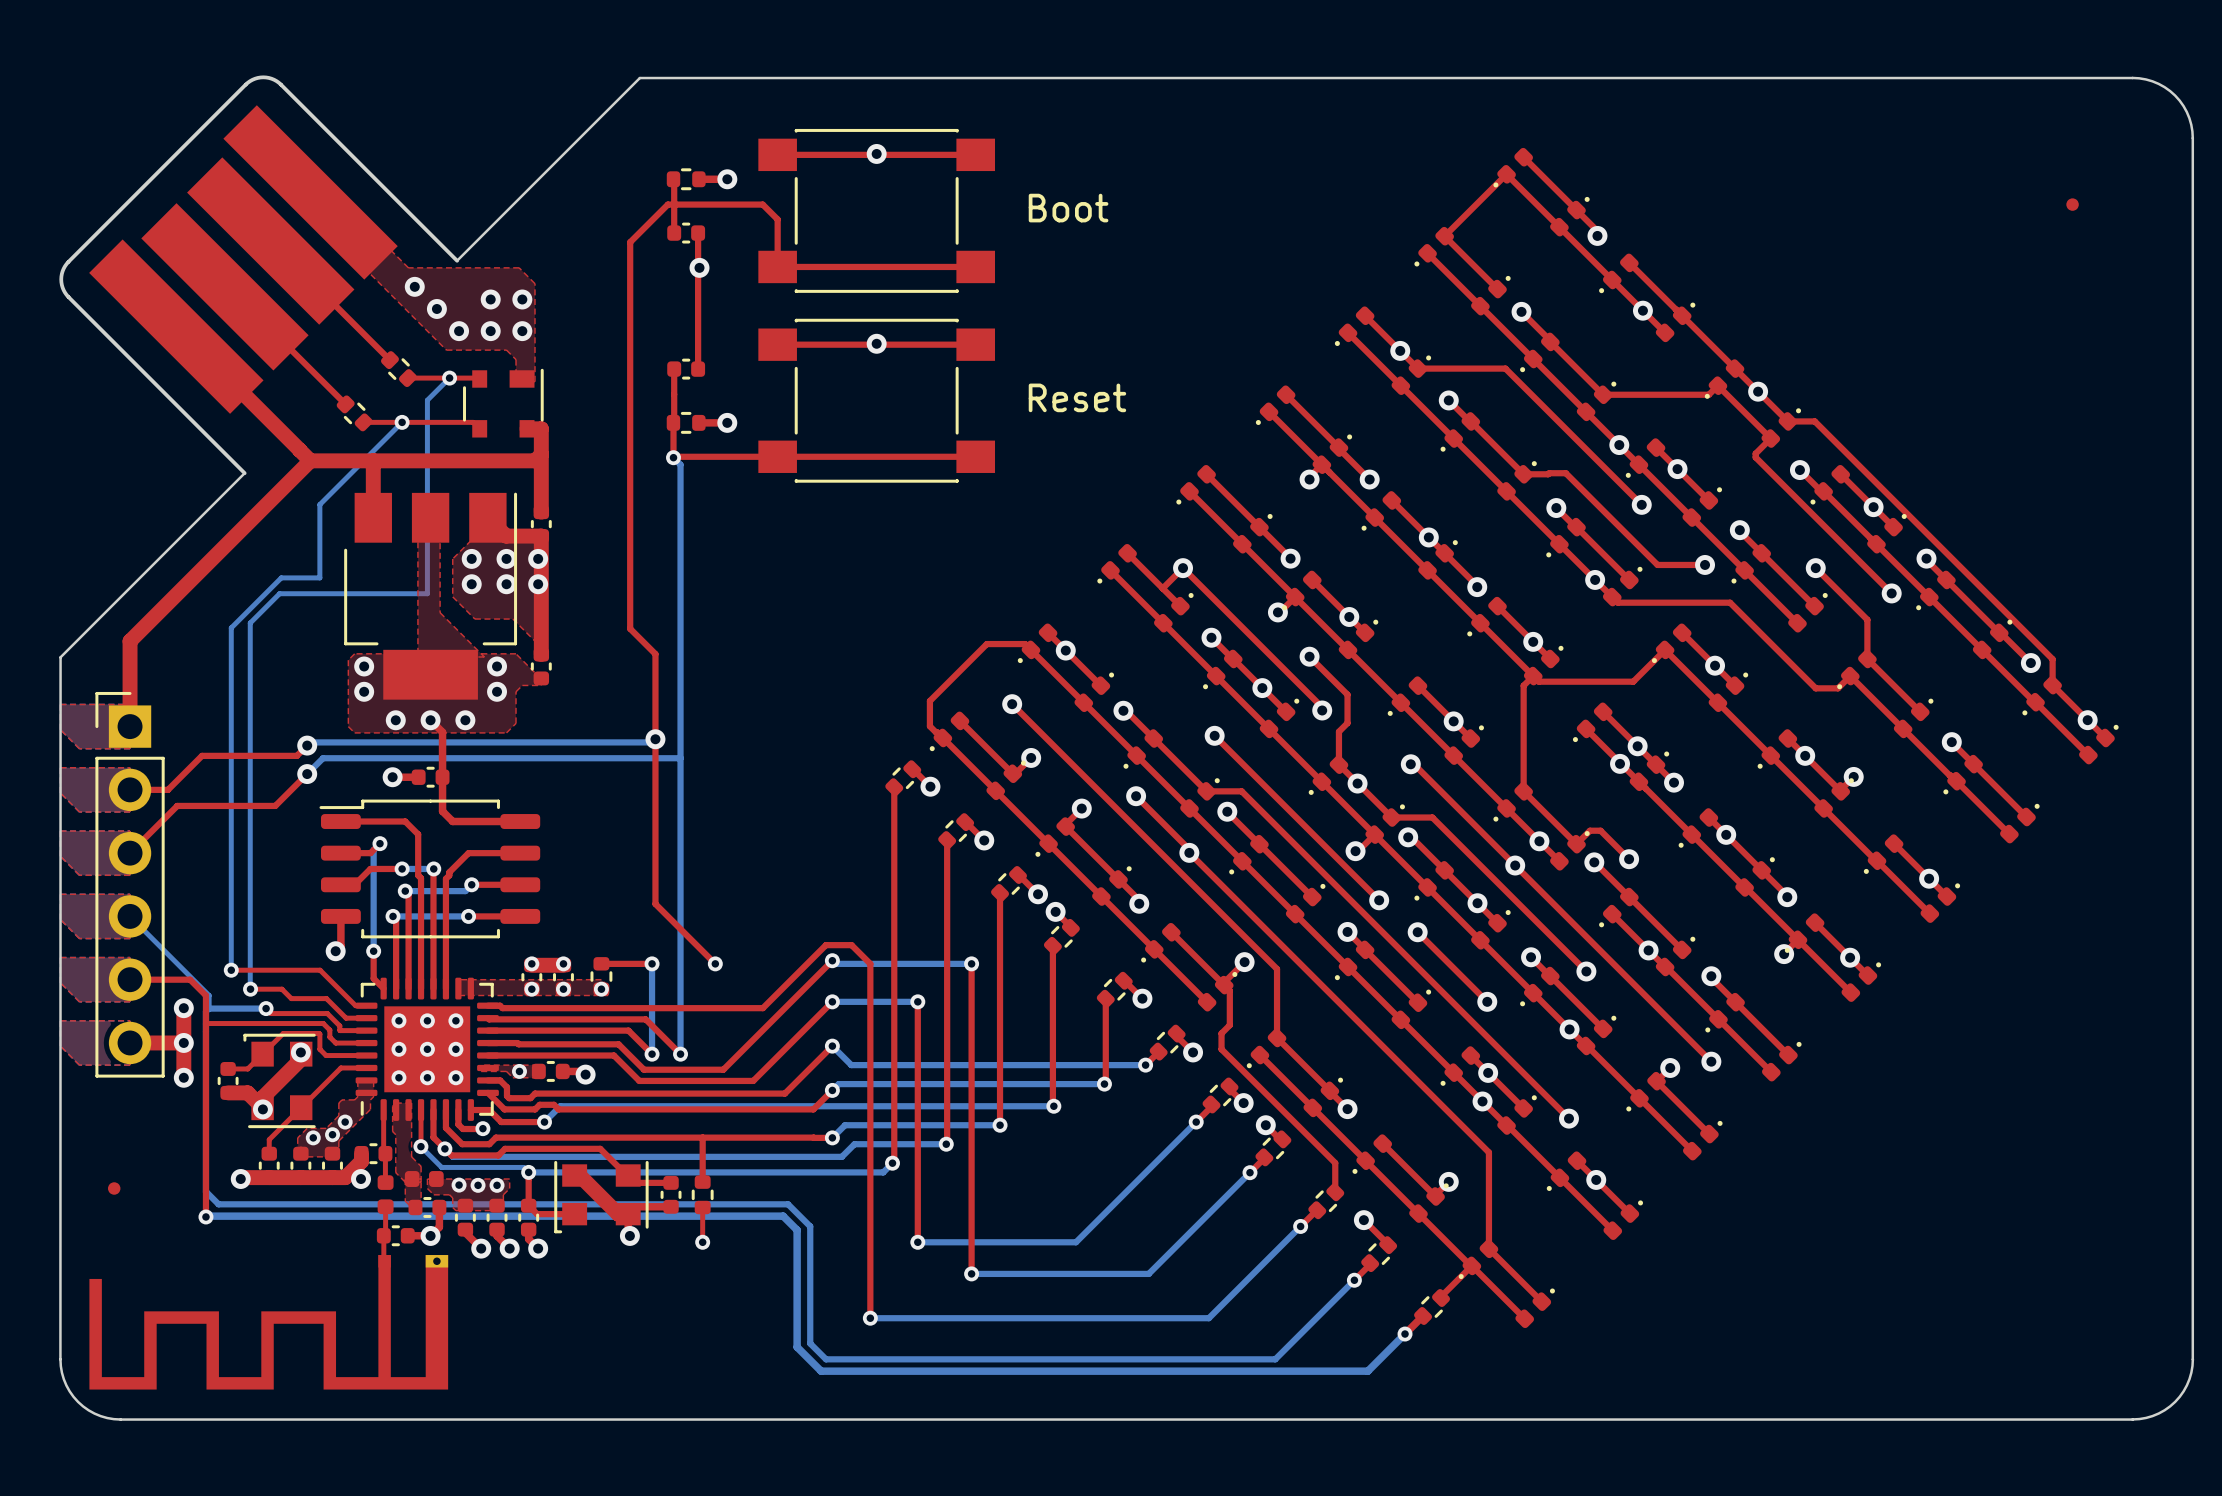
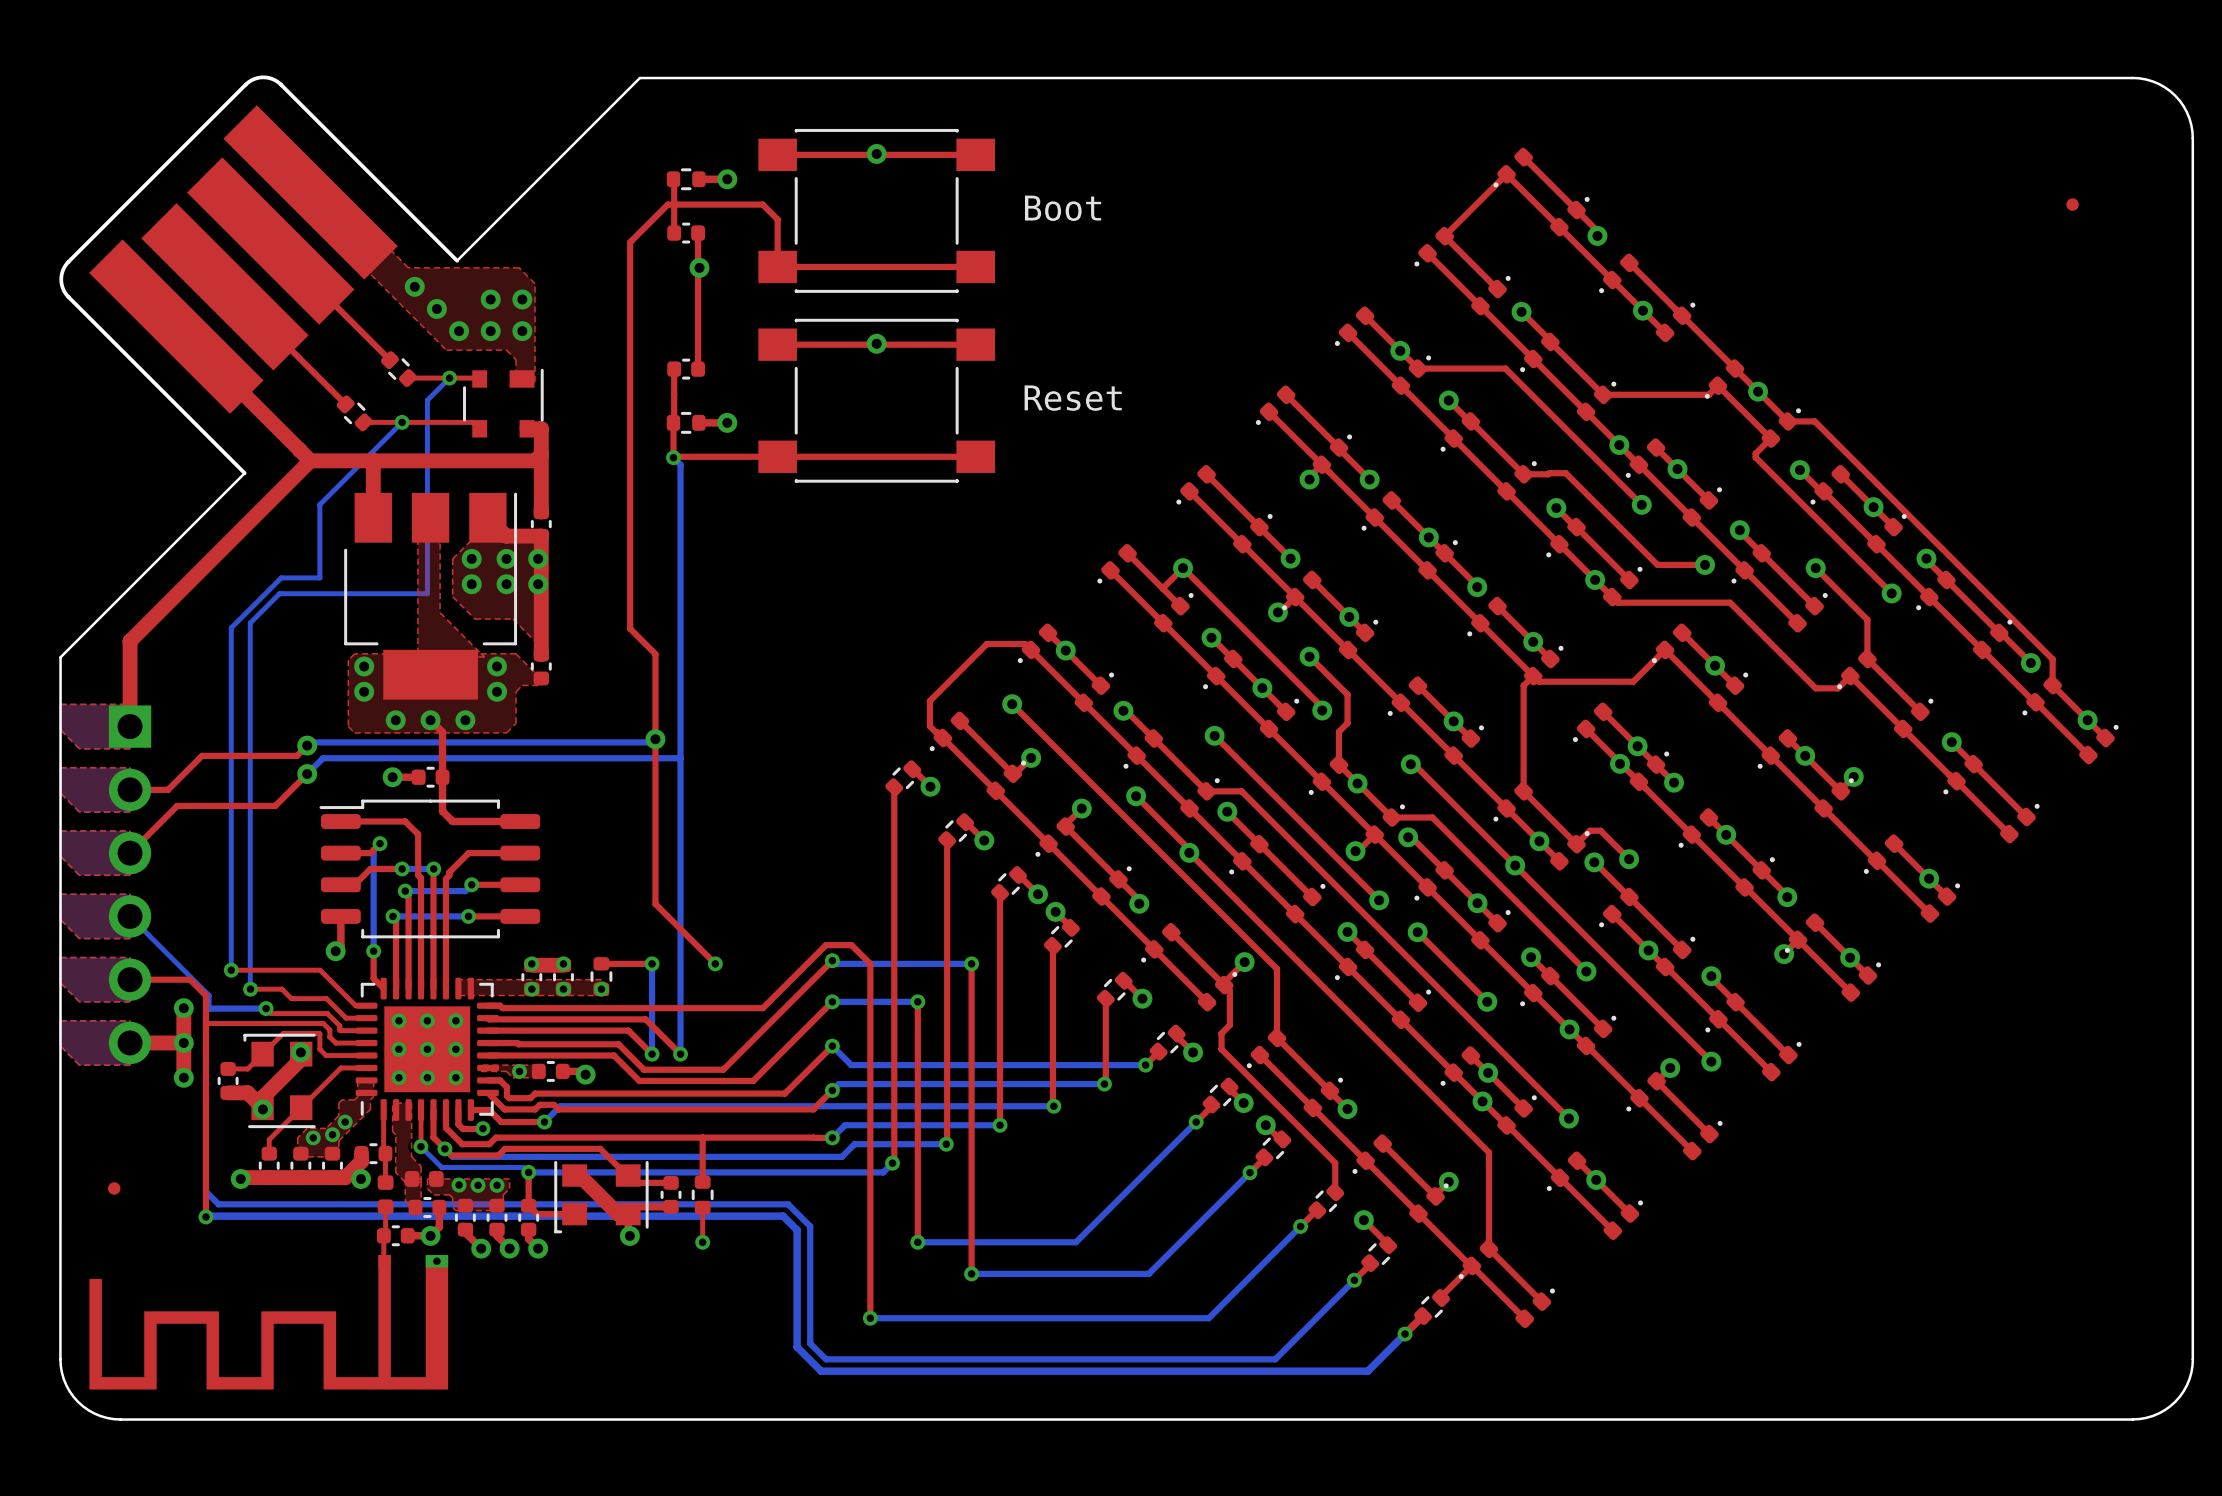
part footprint: [95, 691, 165, 1078] -> [108, 705, 152, 1065]

